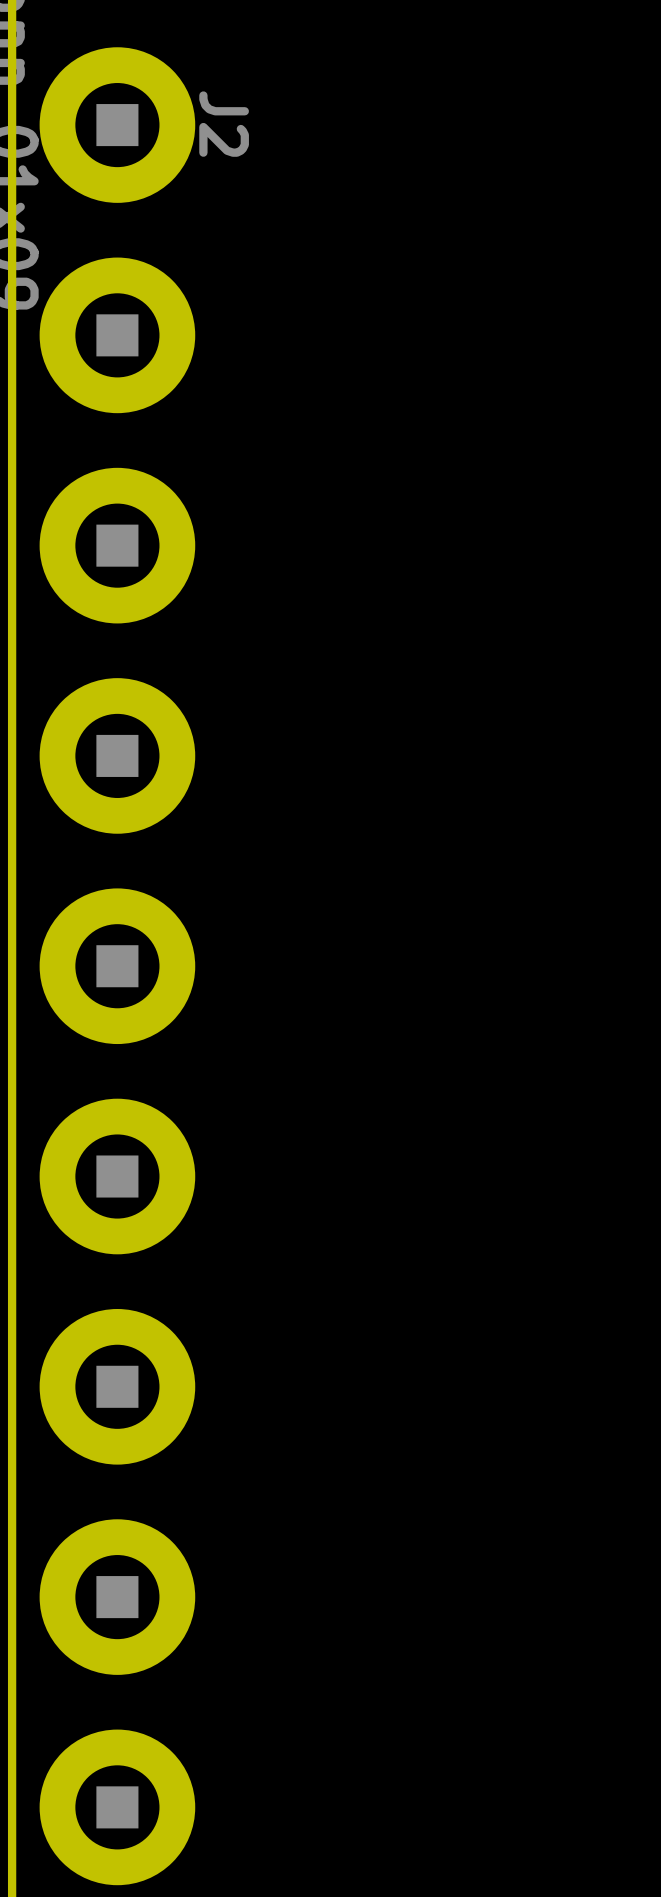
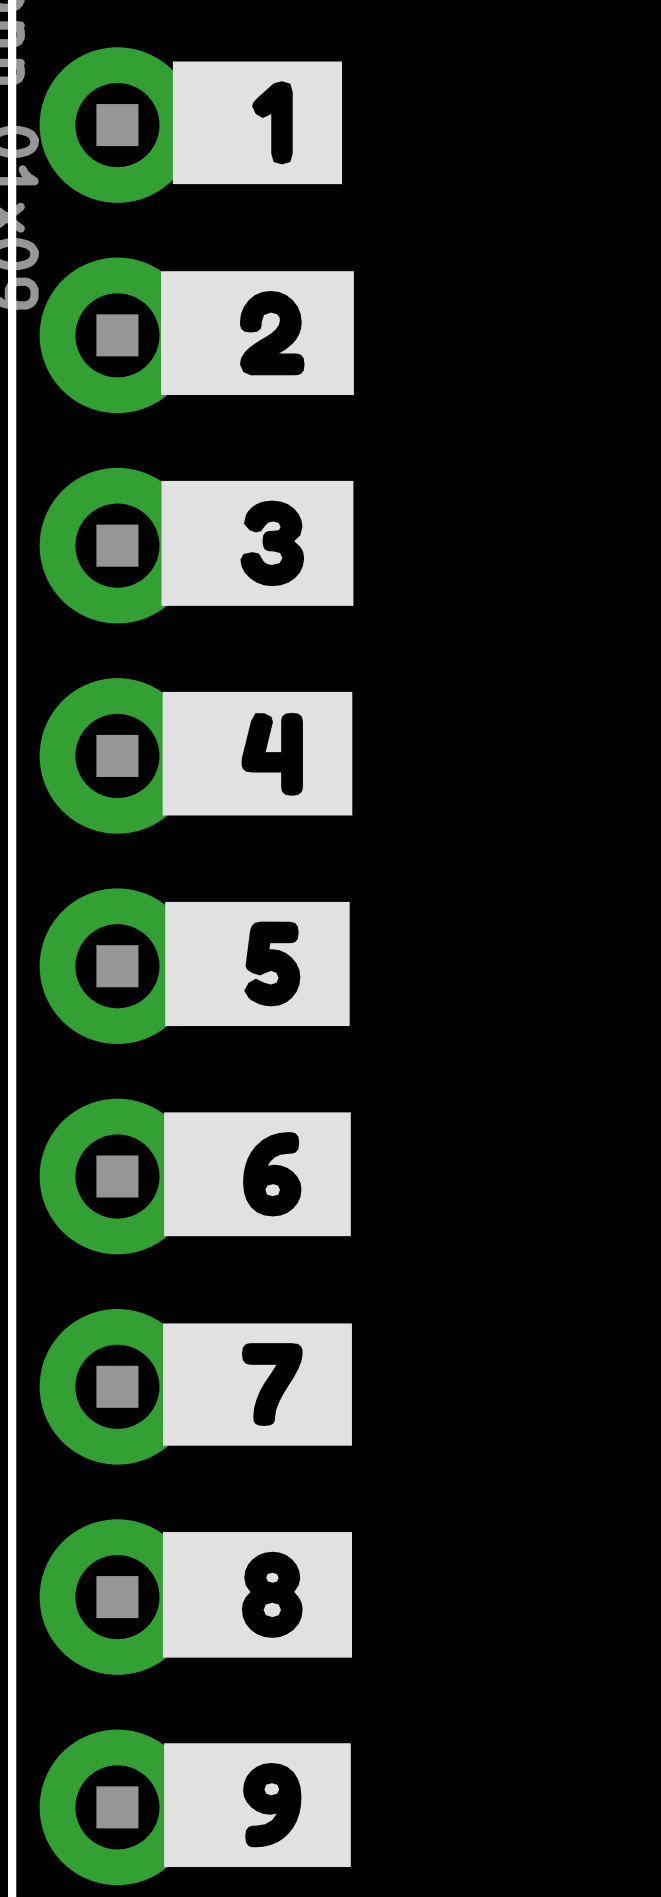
drawing: none -> [161, 61, 354, 1868]

